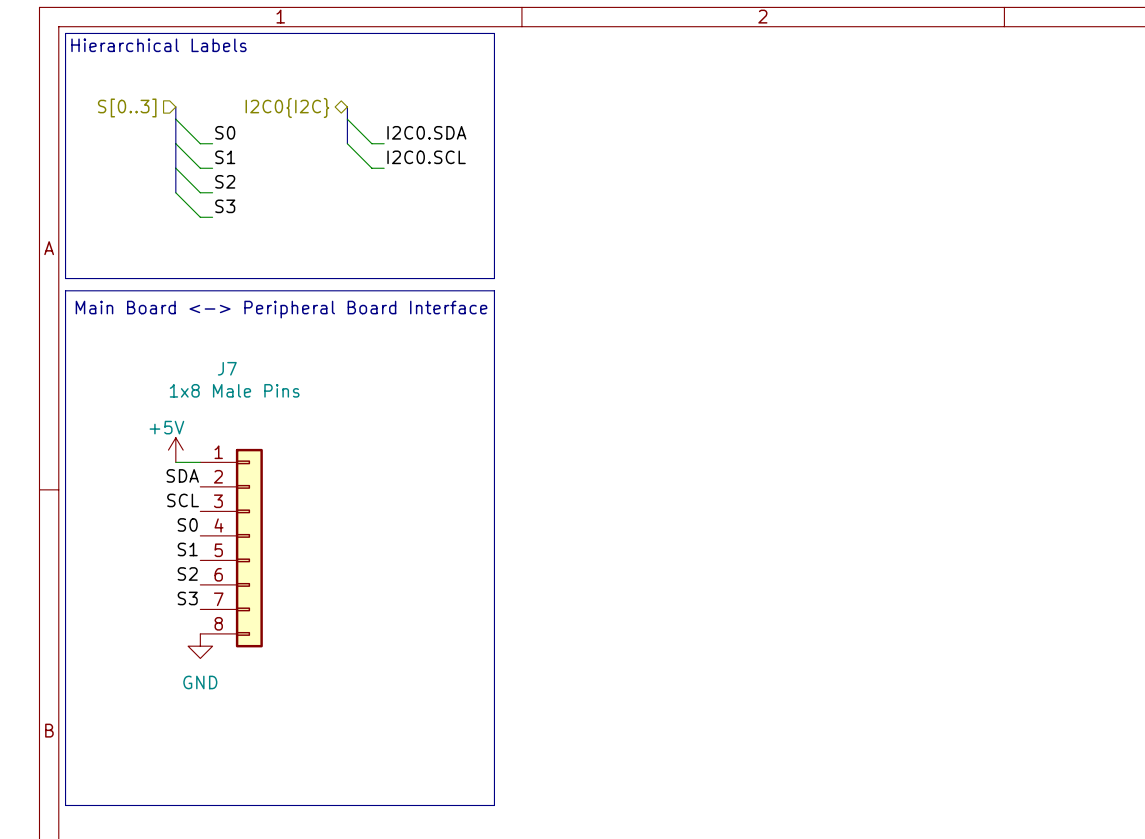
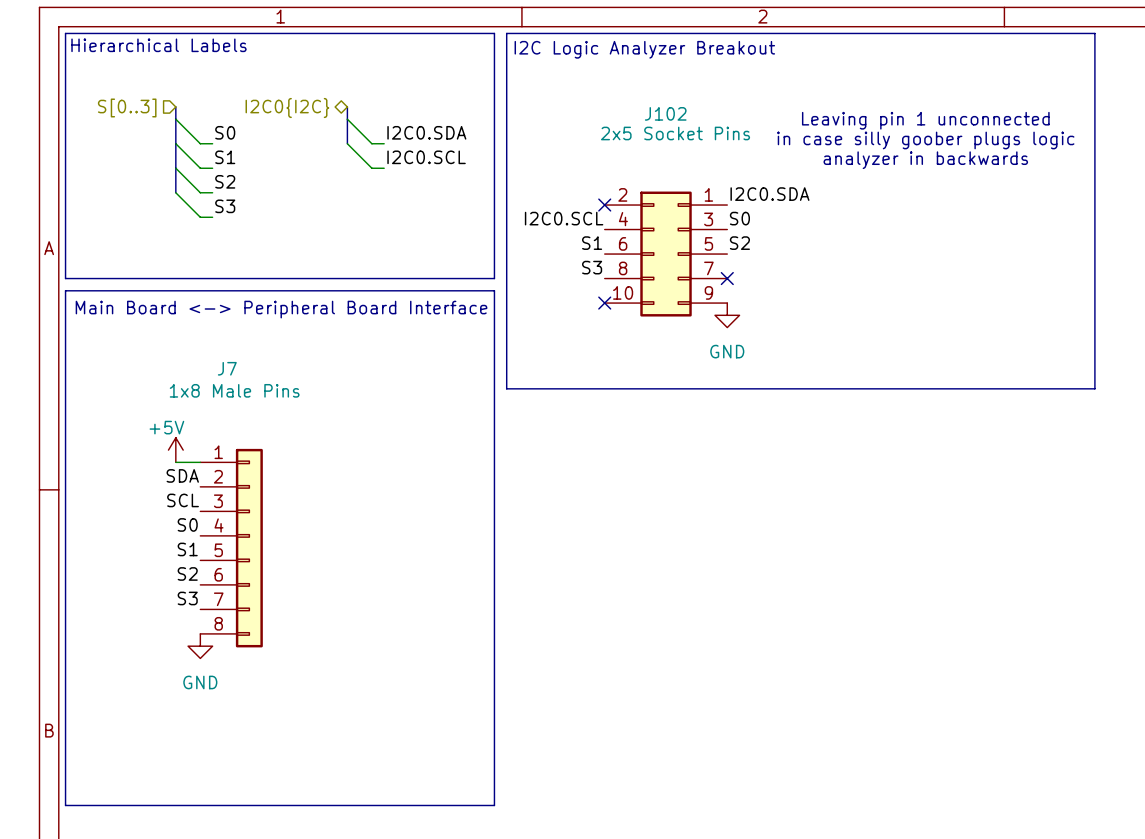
line: none -> (506, 33) (1094, 33) (1094, 388) (506, 388) (506, 33)
text: none -> I2C Logic Analyzer Breakout (644, 49)
text: none -> Leaving pin 1 unconnected (925, 120)
text: none -> in case silly goober plugs logic (925, 140)
text: none -> analyzer in backwards (925, 160)
label: none -> I2C0.SDA (769, 194)
no-connect mark: none -> (604, 205)
label: none -> I2C0.SCL (564, 218)
label: none -> S0 (739, 218)
label: none -> S1 (592, 243)
label: none -> S2 (739, 243)
J102: none -> 2x5 Socket Pins (666, 254)
label: none -> S3 (592, 267)
no-connect mark: none -> (727, 278)
no-connect mark: none -> (604, 303)
power symbol: none -> GND (727, 315)

